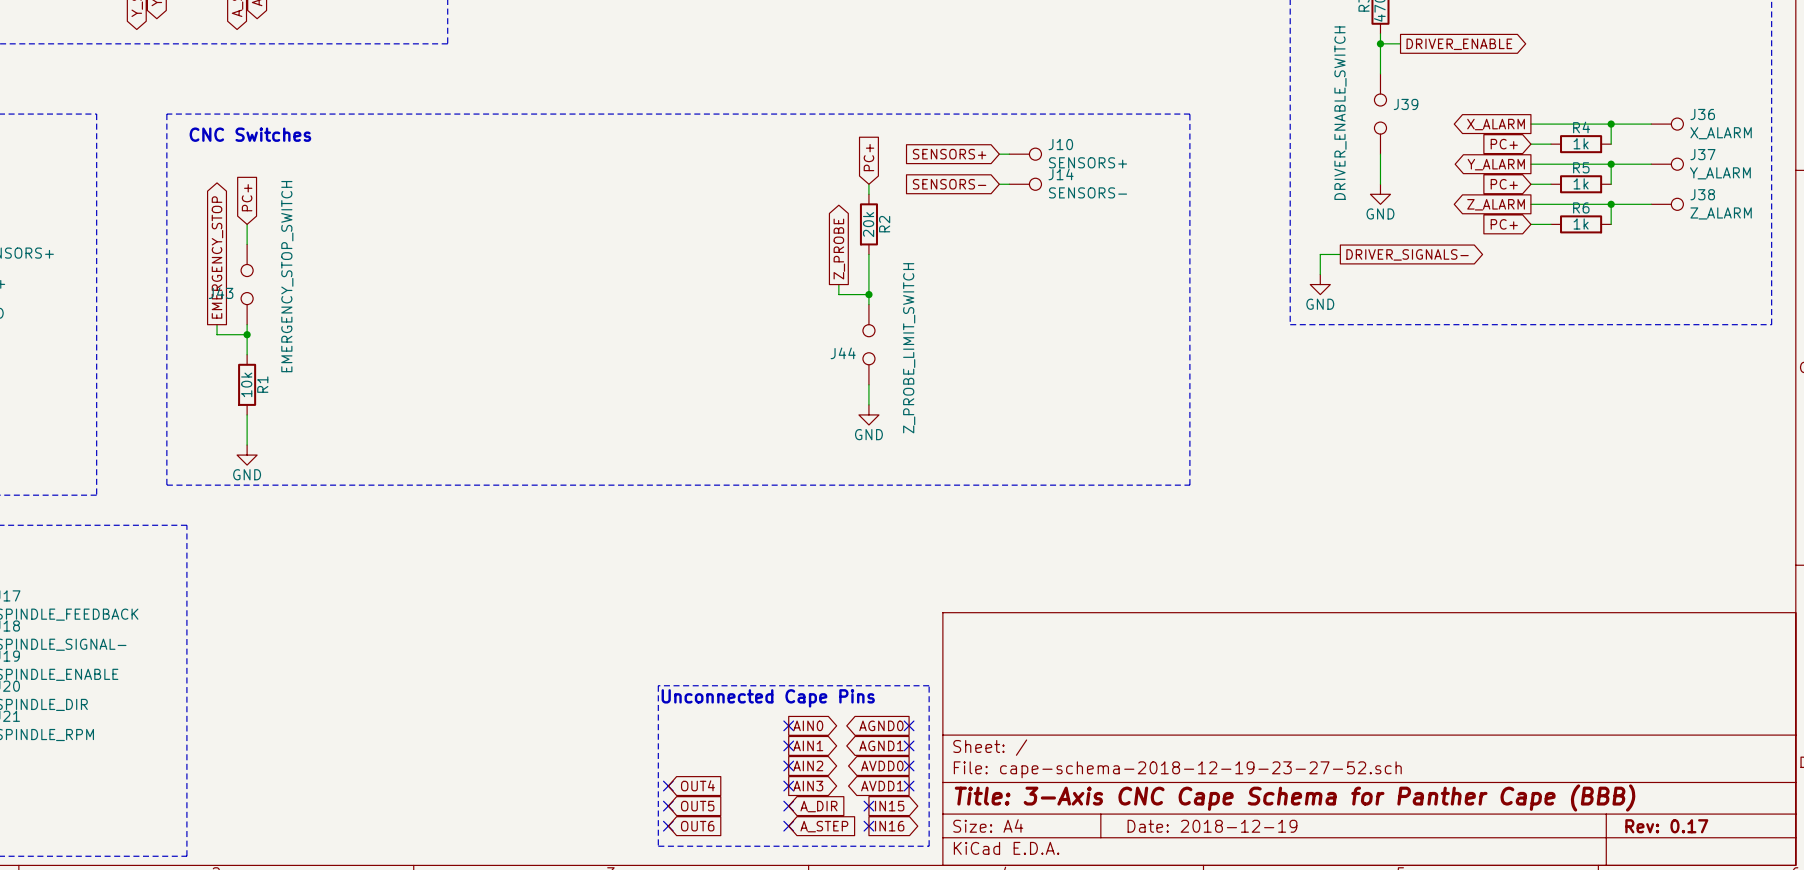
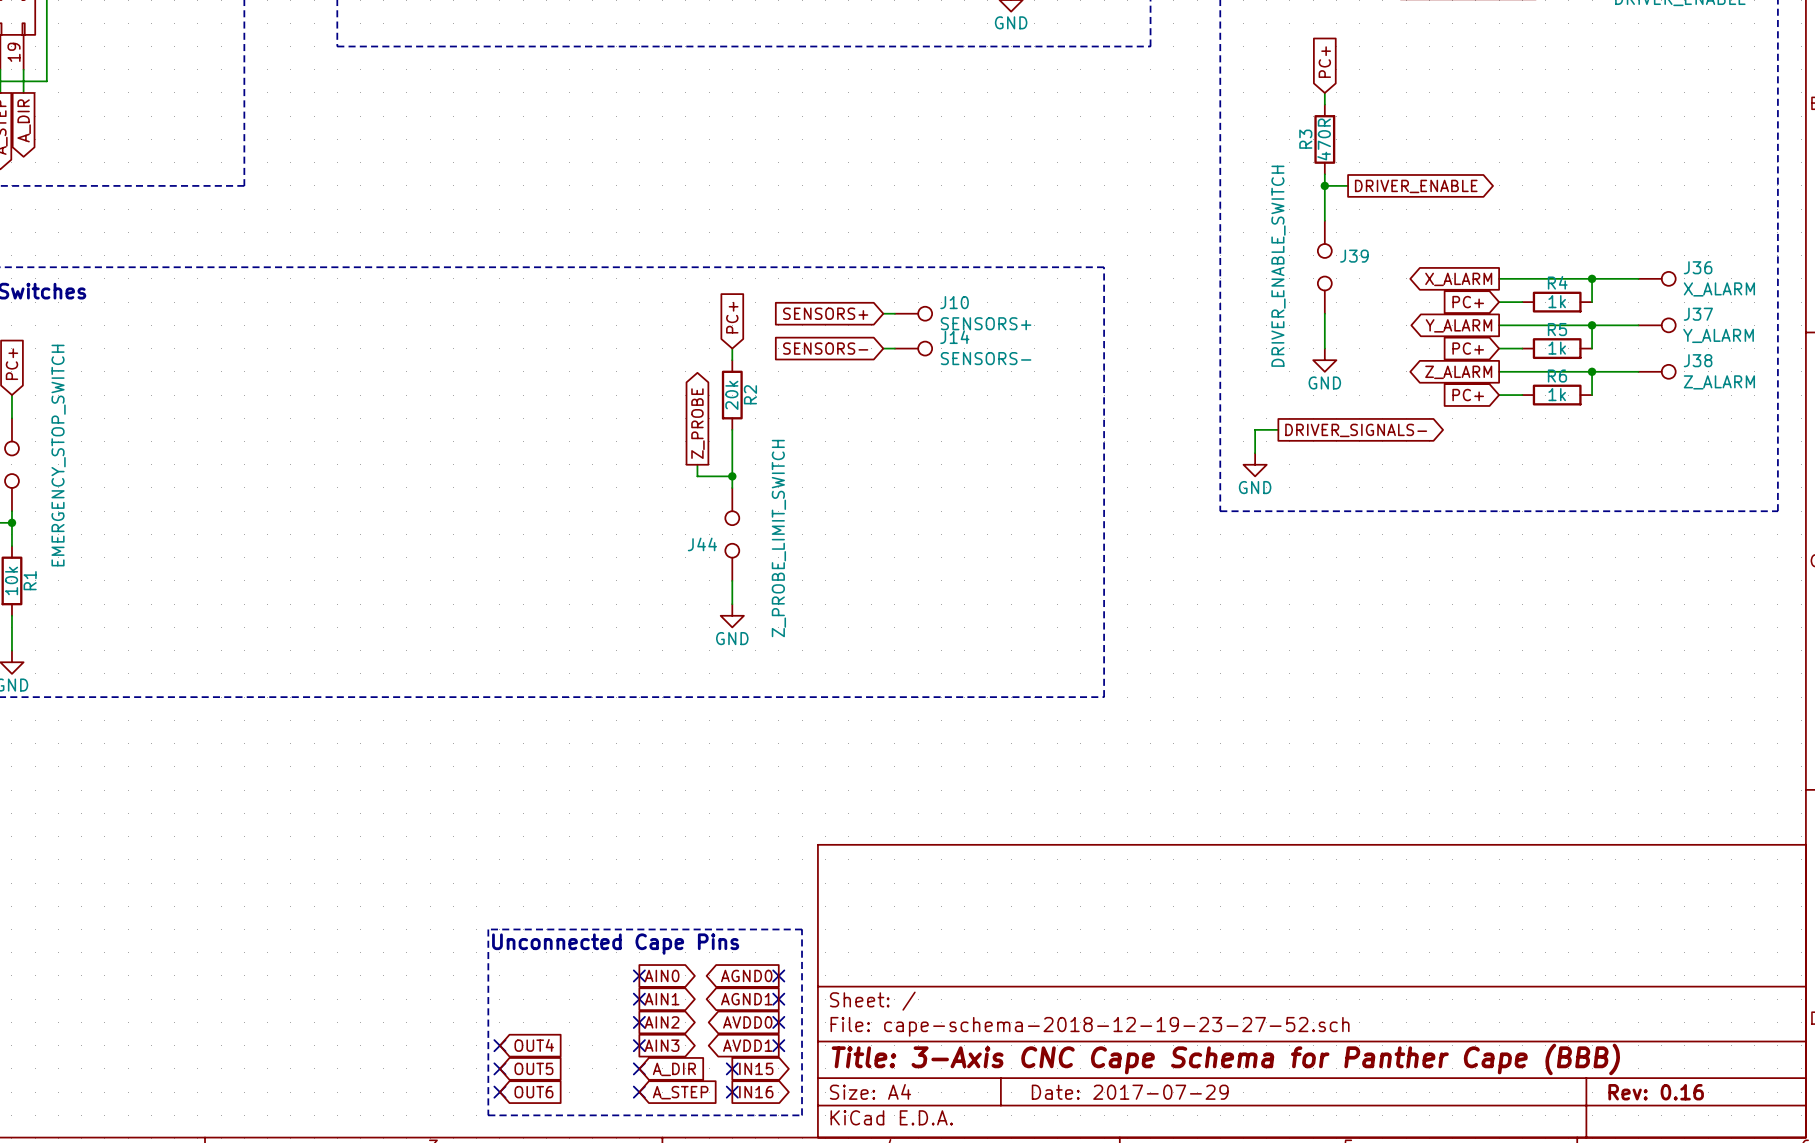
title block: Date: 2018-12-19 (1212, 826) -> Date: 2017-07-29 (1130, 1092)
title block: Rev: 0.17 (1666, 826) -> Rev: 0.16 (1656, 1092)

